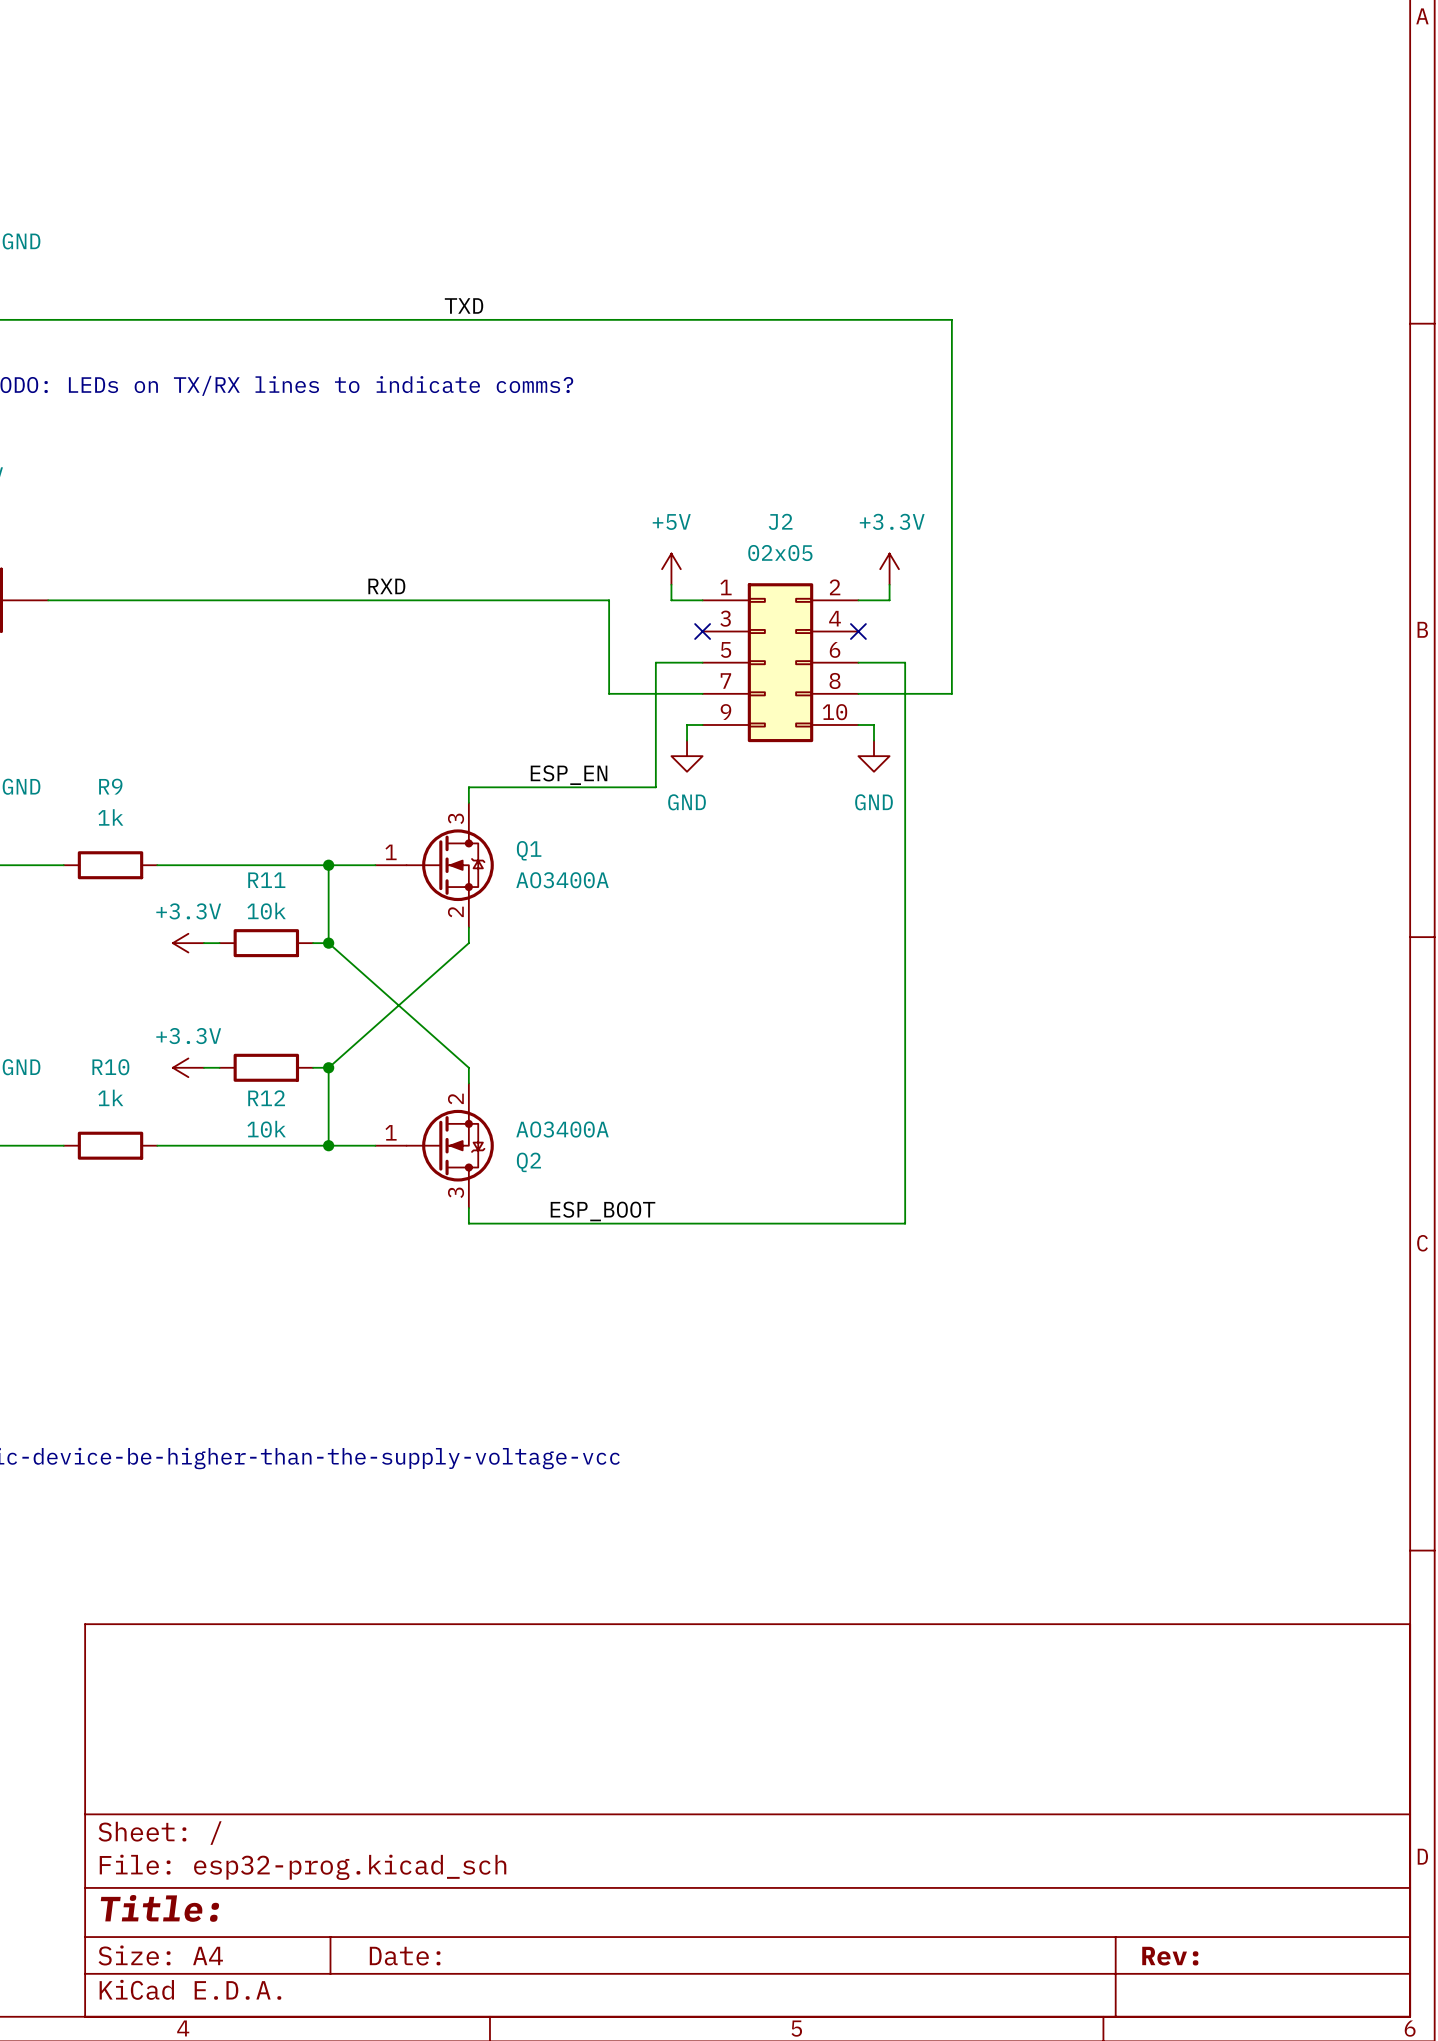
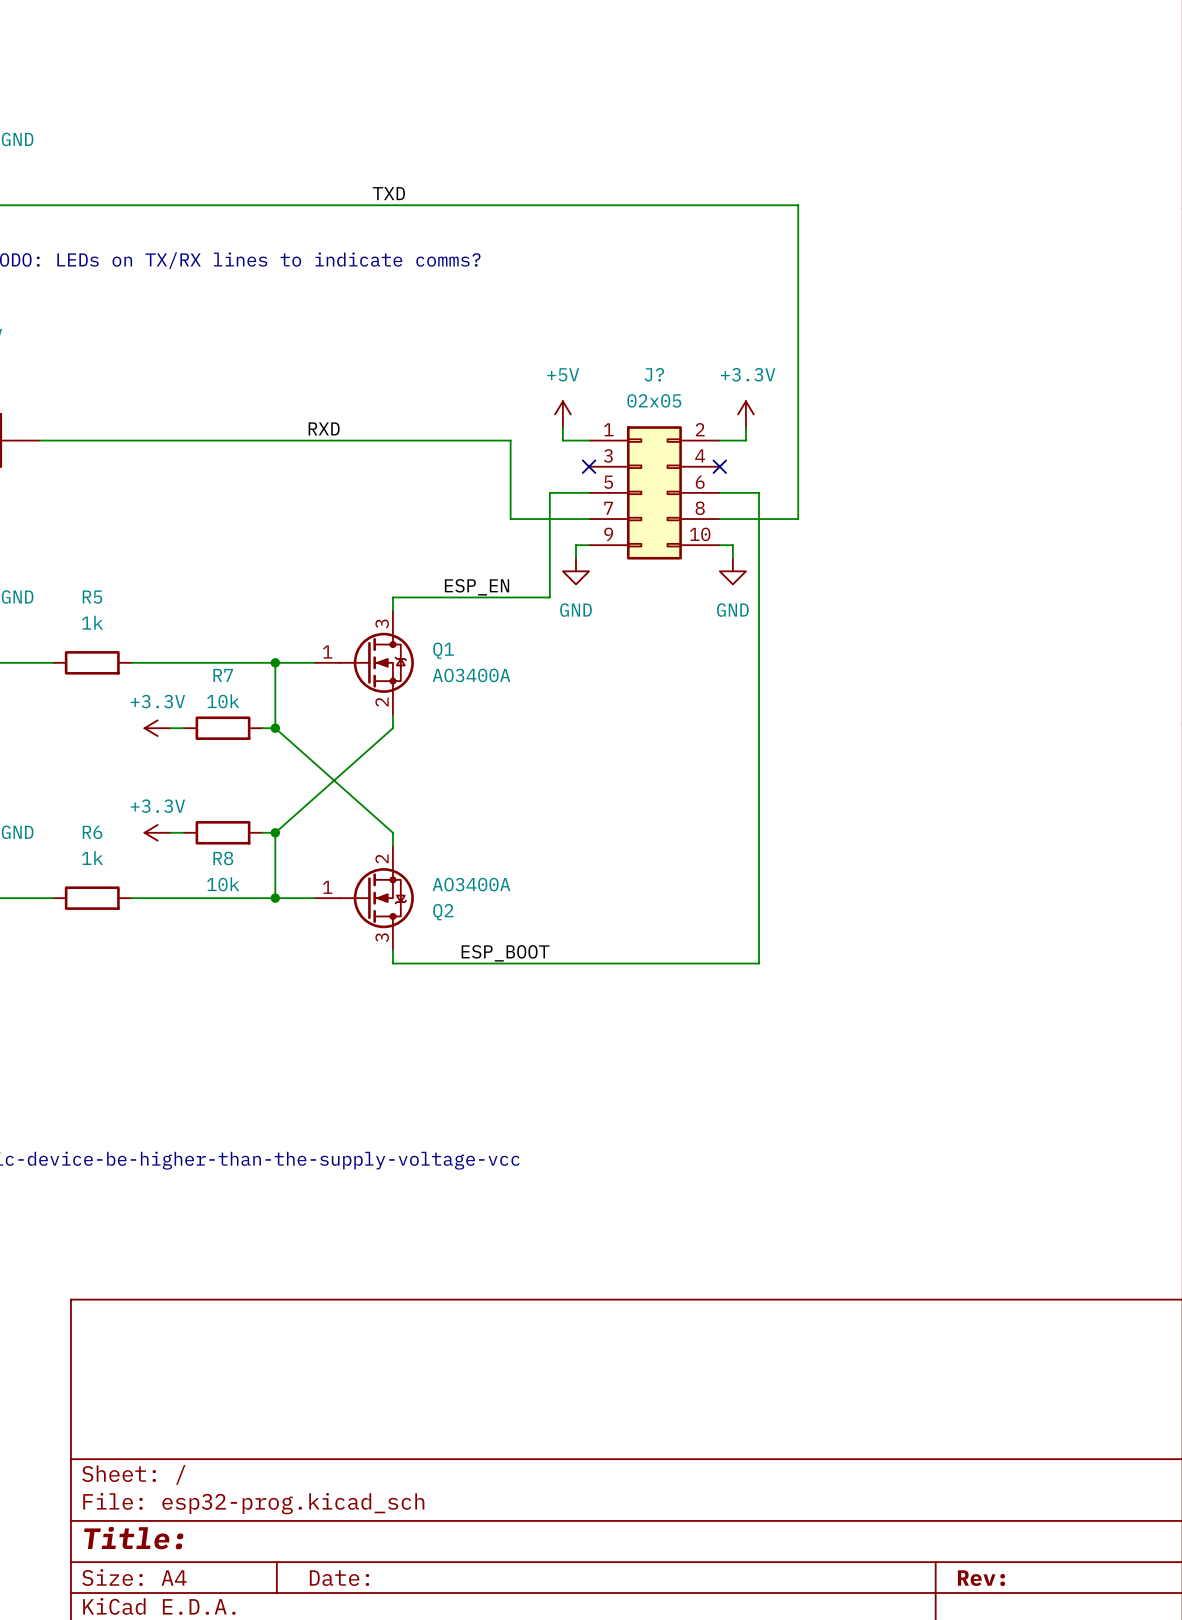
J2 name: J2 (780, 521) -> J? (654, 374)
R9 name: R9 (110, 786) -> R5 (92, 597)
R11 name: R11 (266, 880) -> R7 (223, 675)
R10 name: R10 (110, 1067) -> R6 (92, 832)
R12 name: R12 (266, 1098) -> R8 (223, 858)

